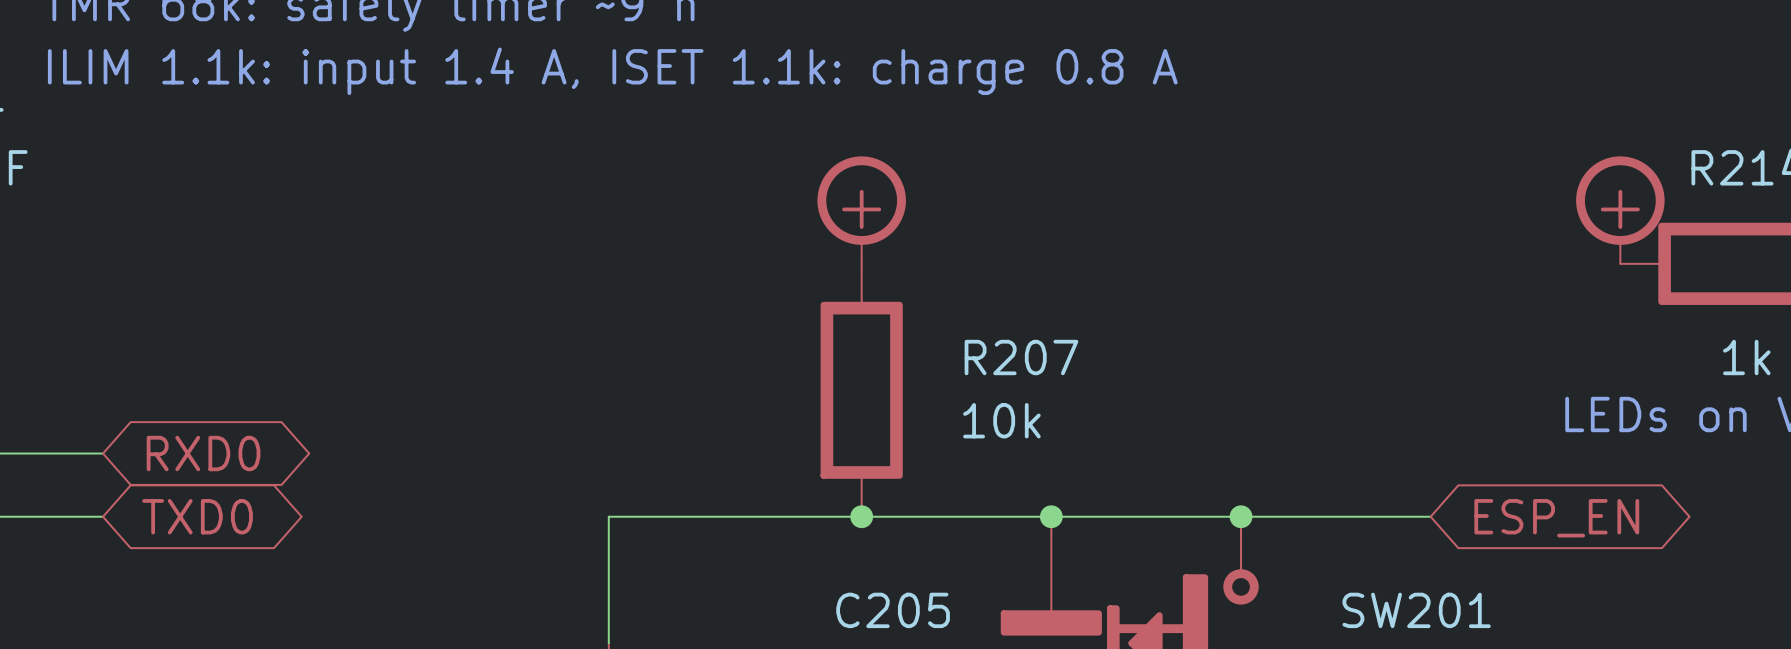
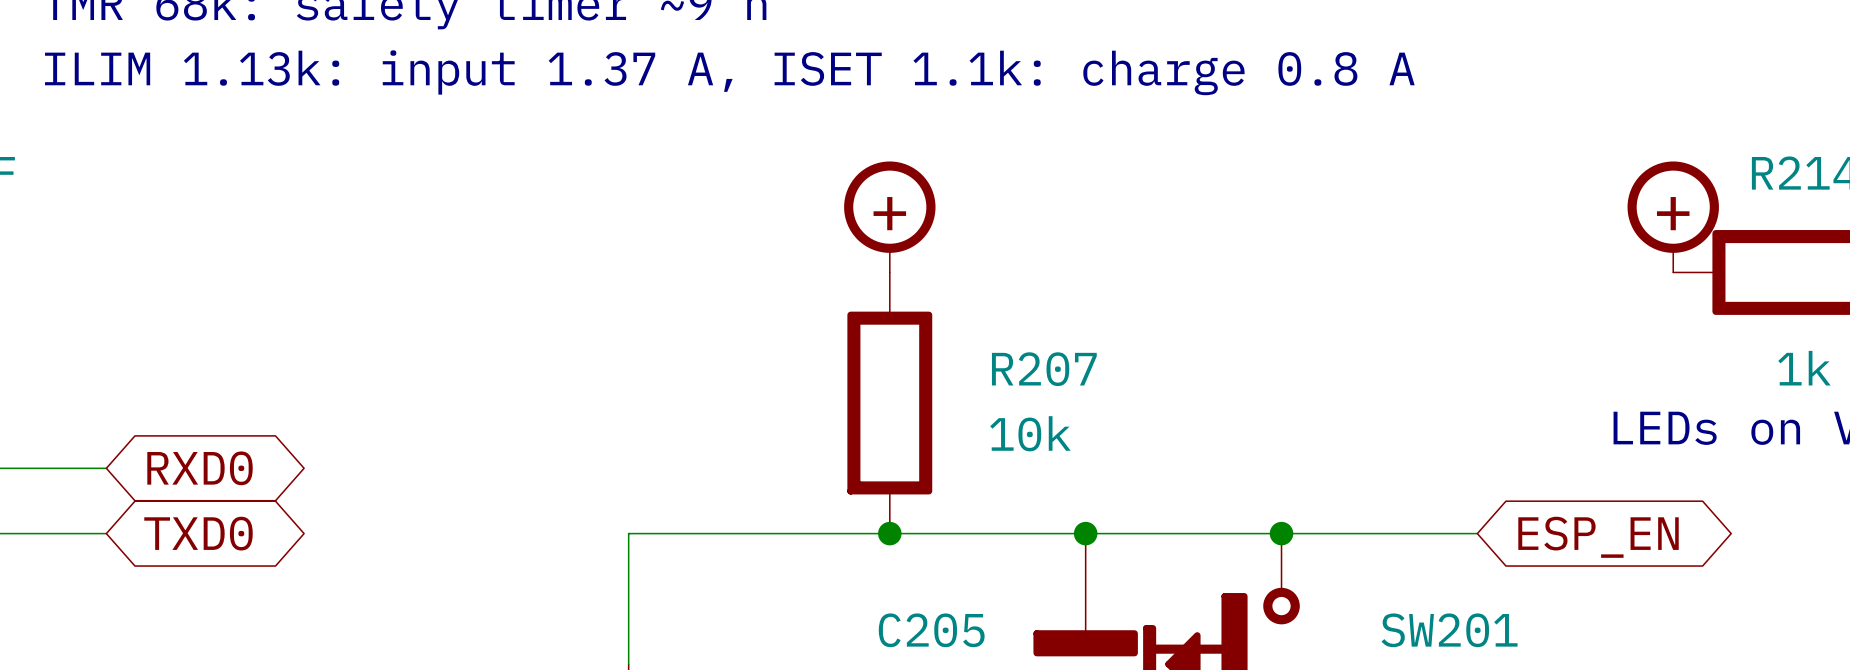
text: ILIM 1.1k: input 1.4 A, ISET 1.1k: charge 0.8 A (612, 71) -> ILIM 1.13k: input 1.37 A, ISET 1.1k: charge 0.8 A (729, 72)

